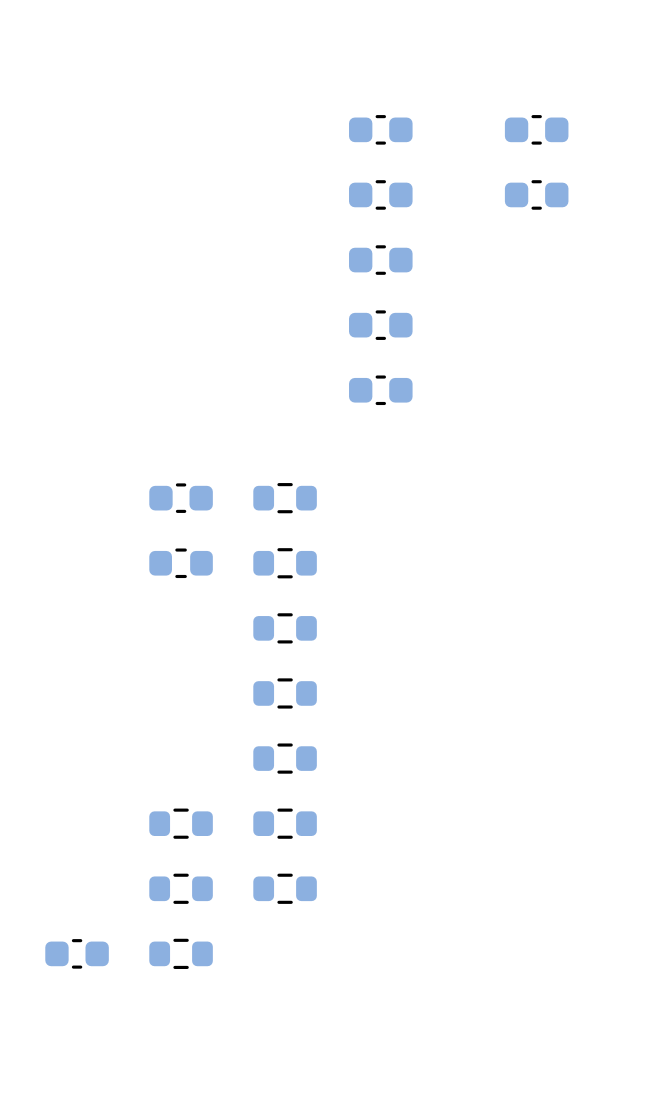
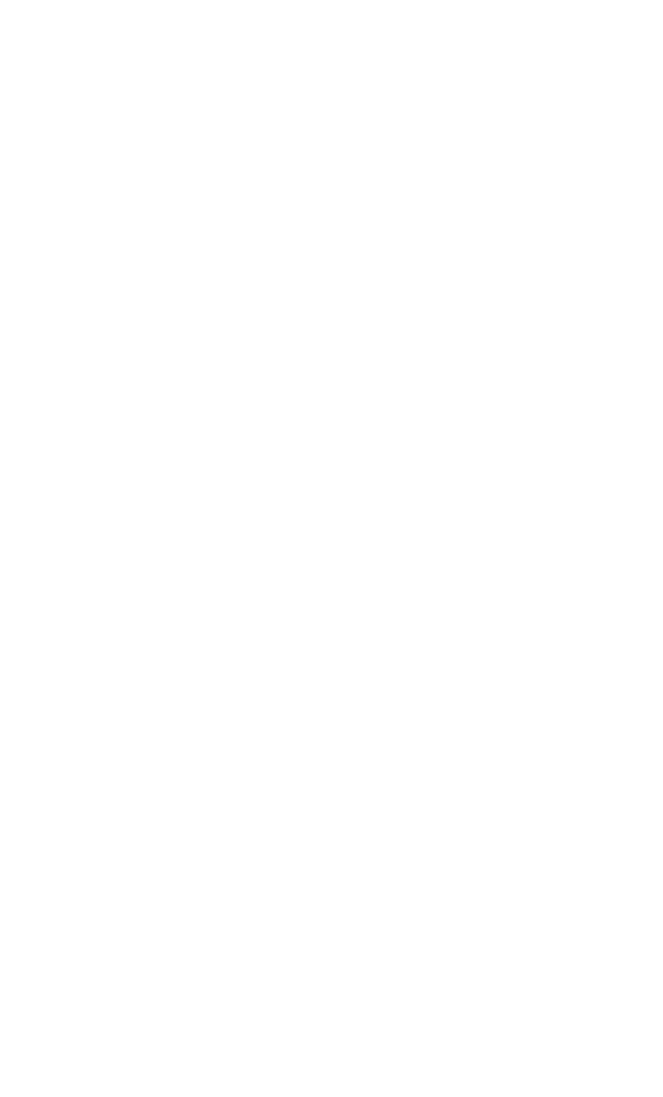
part: (380, 129) -> none
part: (536, 129) -> none
part: (380, 194) -> none
part: (536, 194) -> none
part: (380, 260) -> none
part: (380, 325) -> none
part: (380, 390) -> none
part: (181, 498) -> none
part: (285, 498) -> none
part: (181, 563) -> none
part: (285, 563) -> none
part: (285, 628) -> none
part: (285, 693) -> none
part: (285, 758) -> none
part: (181, 823) -> none
part: (285, 823) -> none
part: (181, 888) -> none
part: (285, 888) -> none
part: (77, 953) -> none
part: (181, 953) -> none

